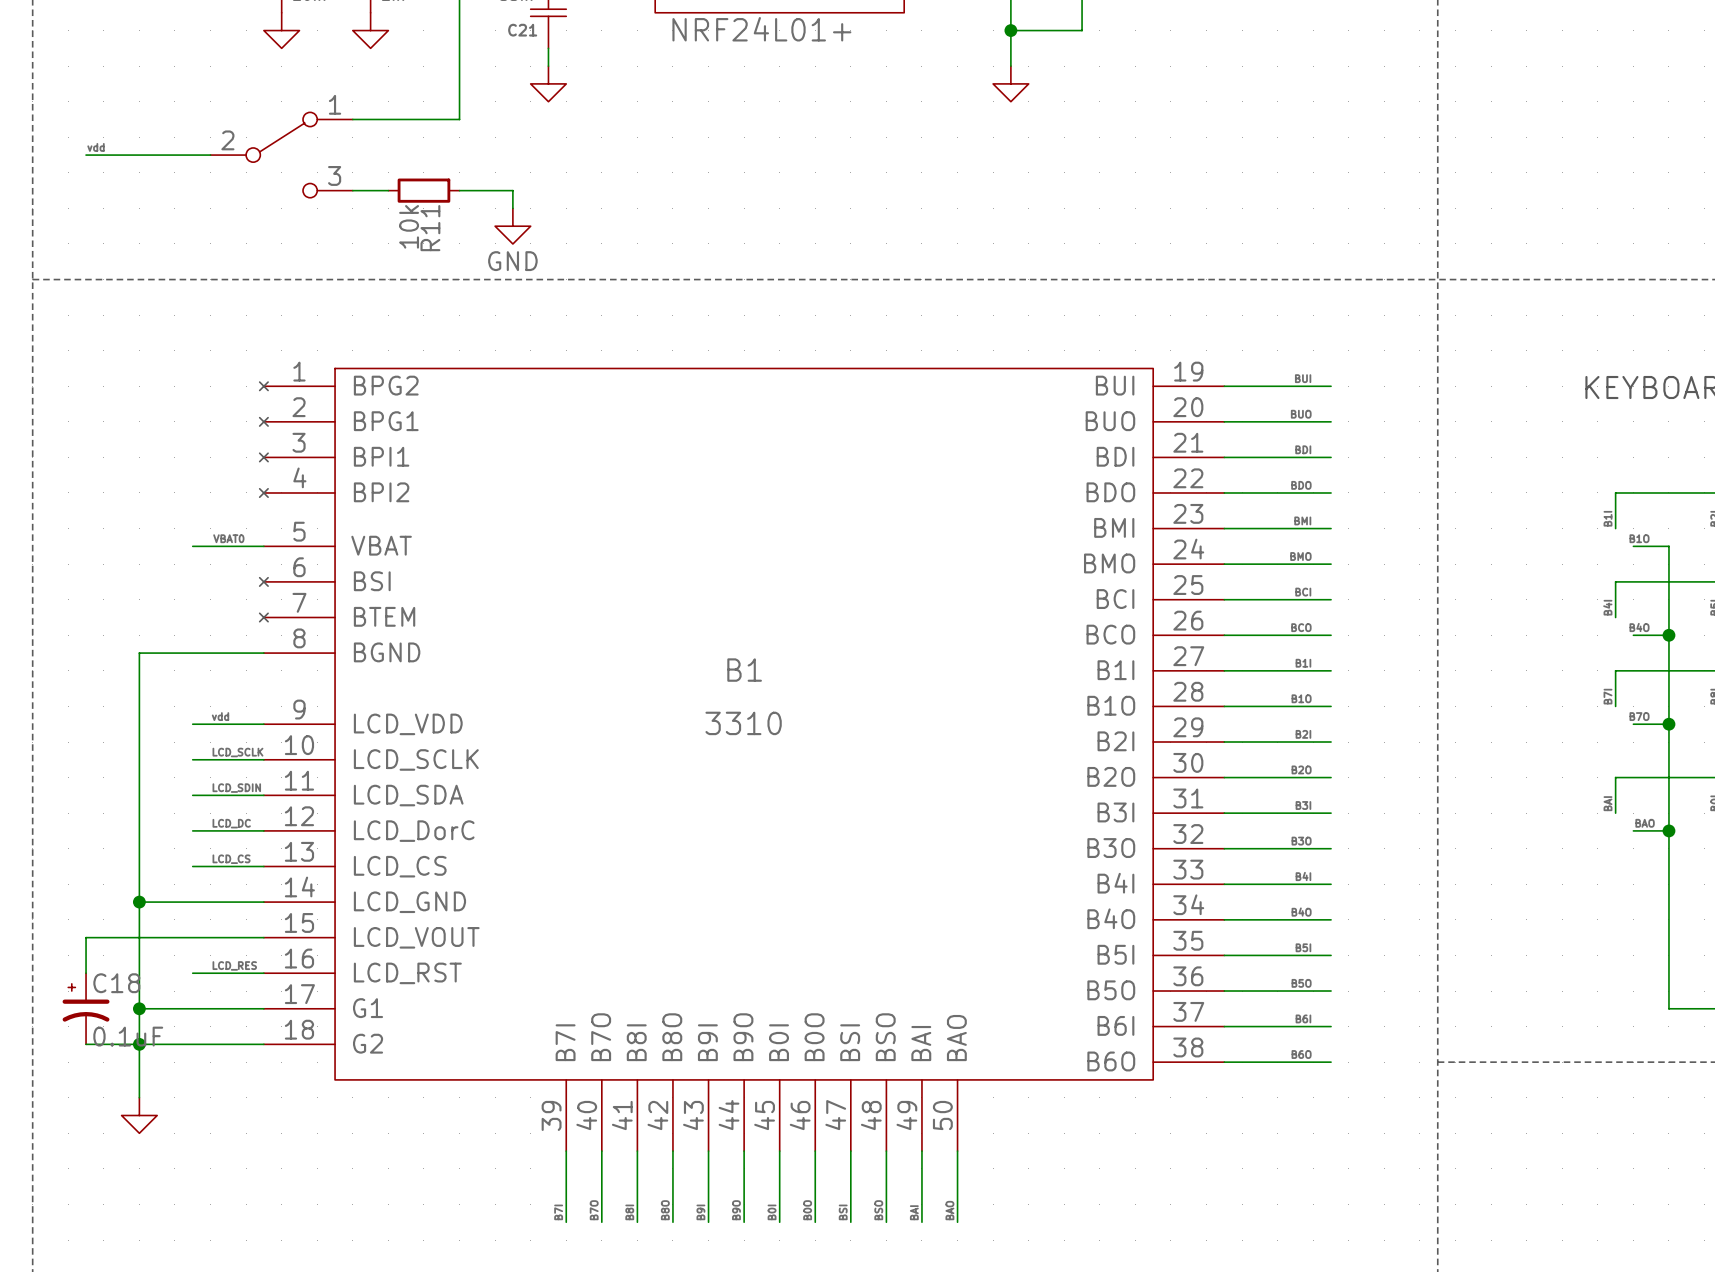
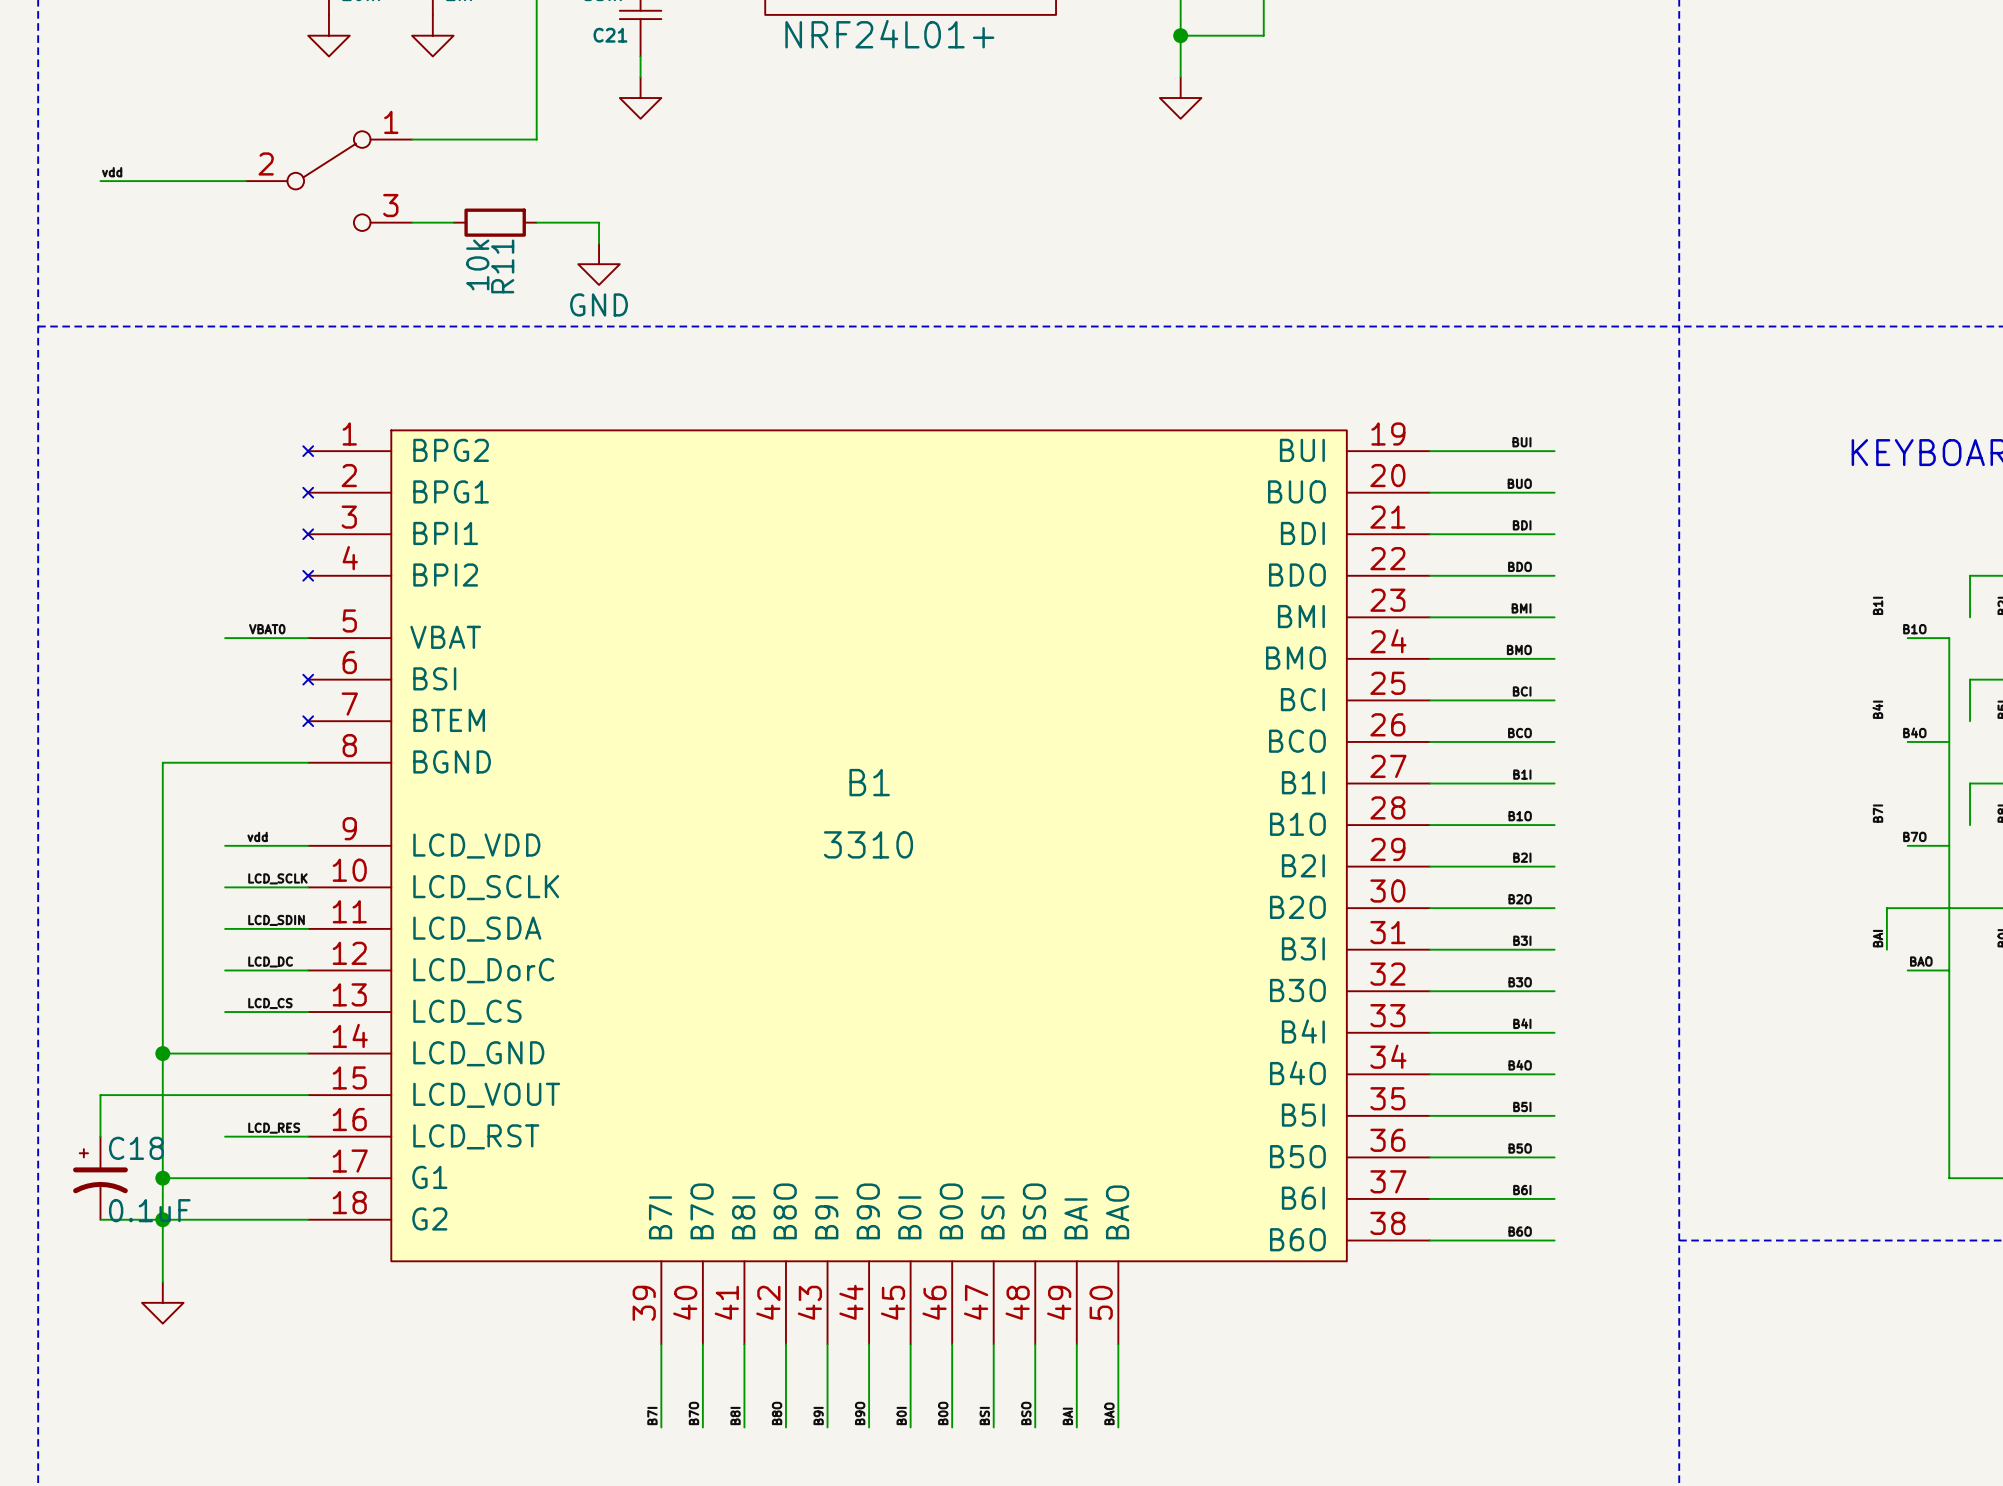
wire: (1686, 492) (1615, 492) (1615, 528) -> (1970, 575) (1970, 617)
wire: (1686, 581) (1615, 581) (1615, 617) -> (1970, 679) (1970, 721)
junction: (1668, 635) -> none
wire: (1686, 670) (1615, 670) (1615, 706) -> (1970, 783) (1970, 825)
junction: (1668, 724) -> none
junction: (1668, 830) -> none

